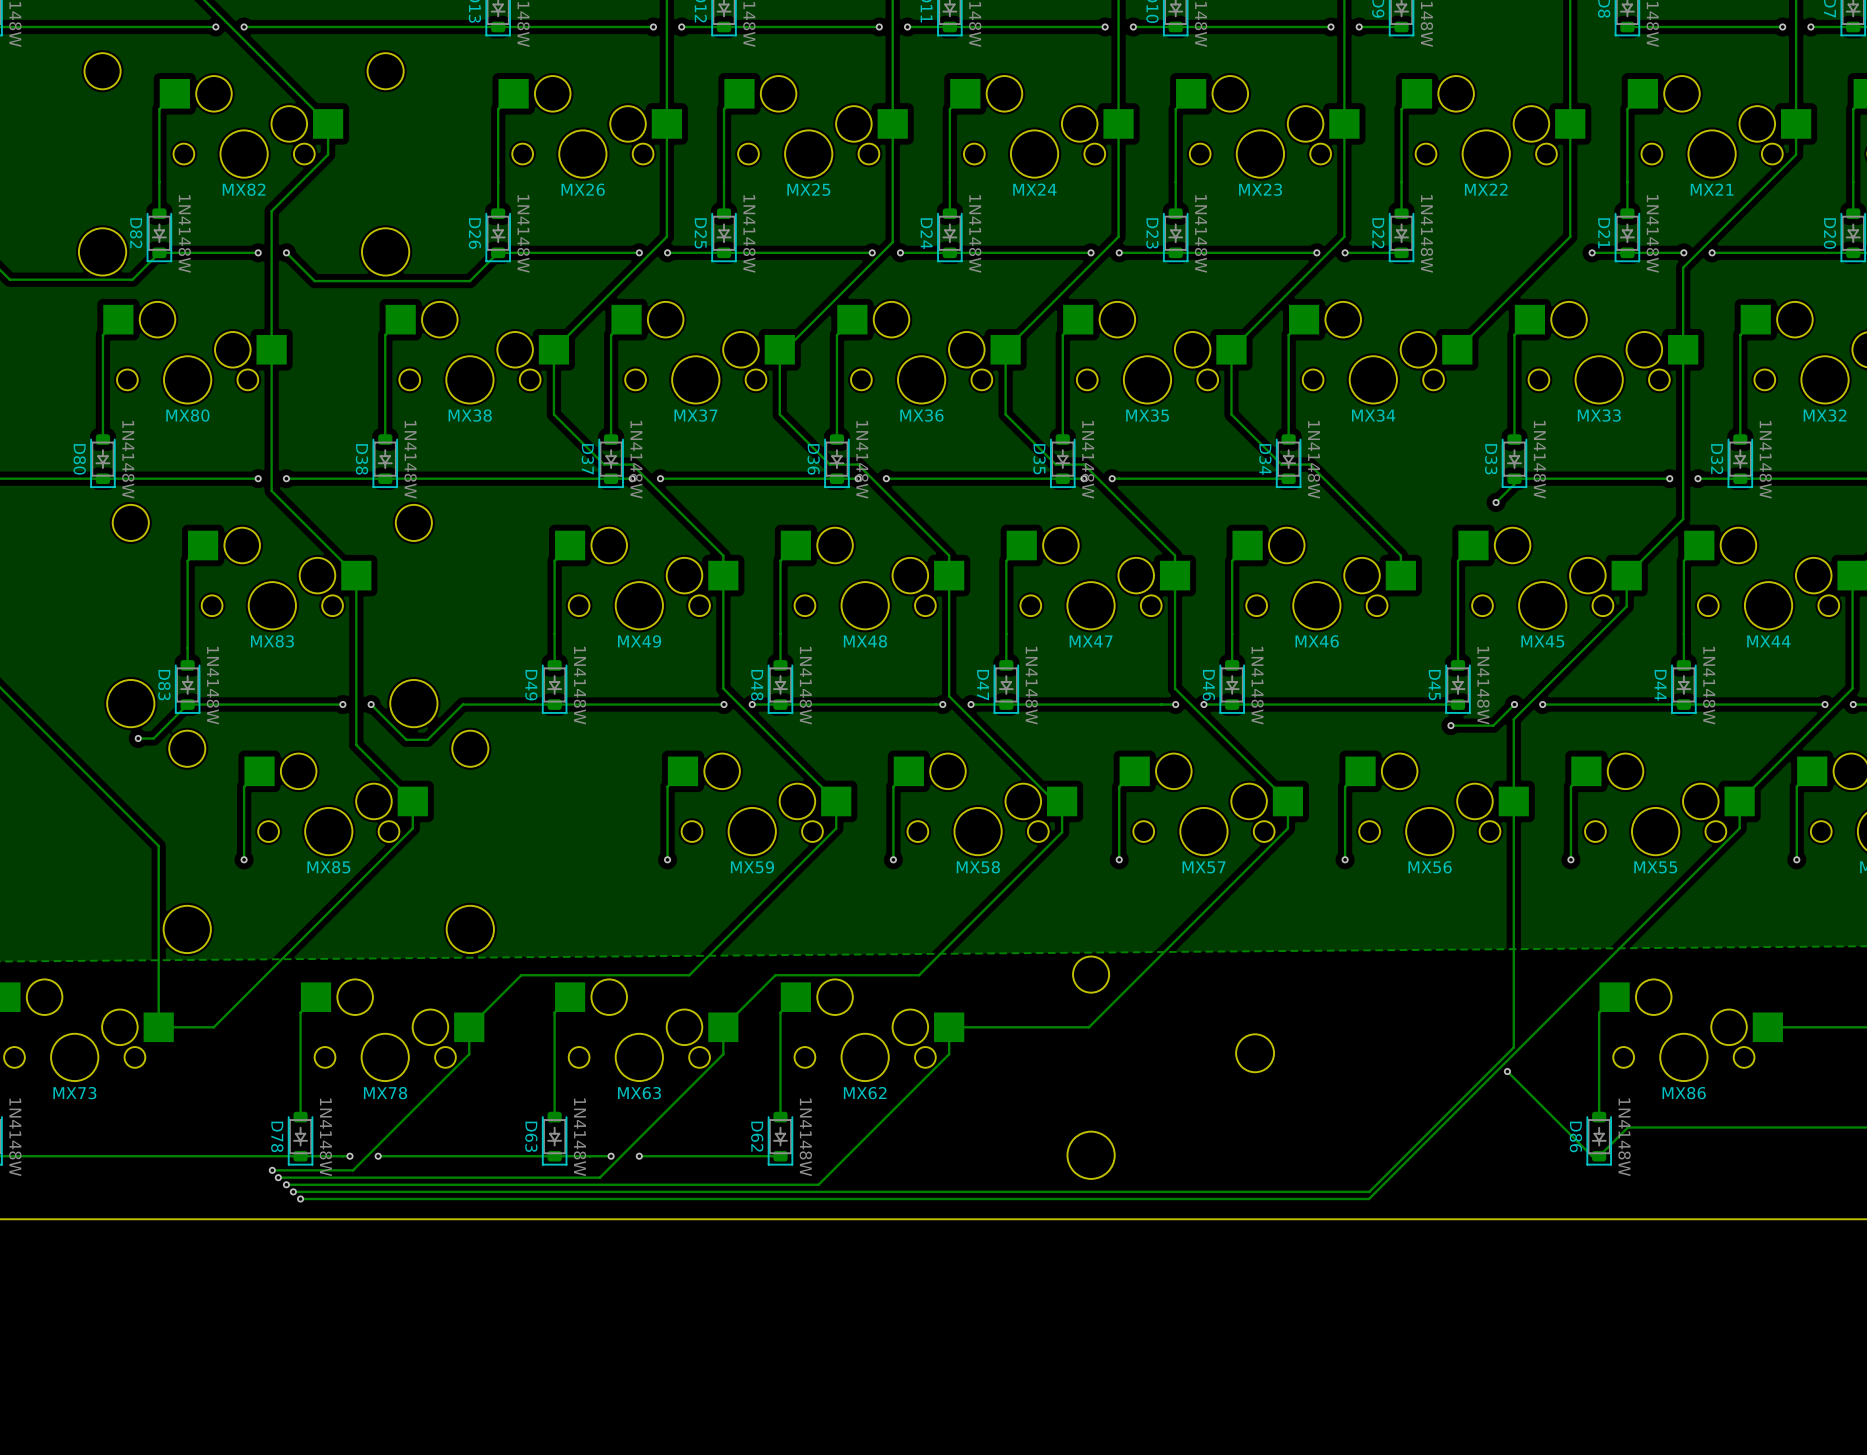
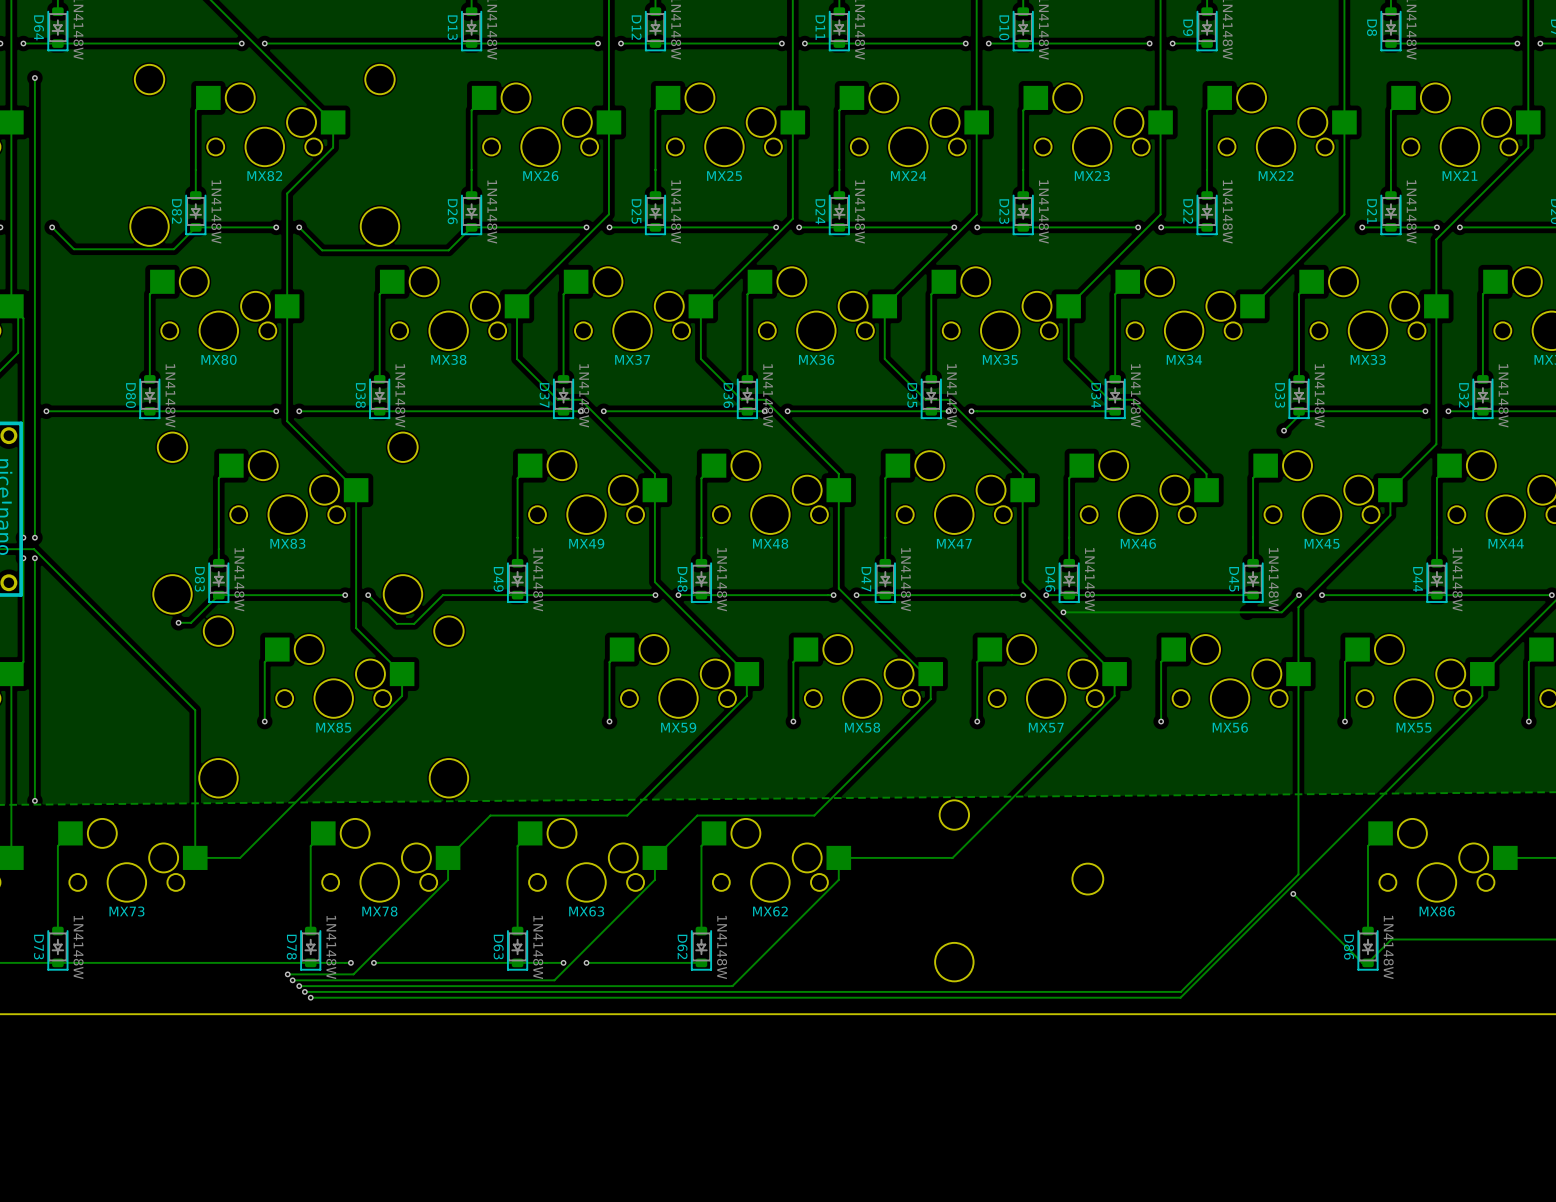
via: none -> (1063, 612)
track: none -> (1247, 612) (1063, 612)
via: (1450, 725) -> none

